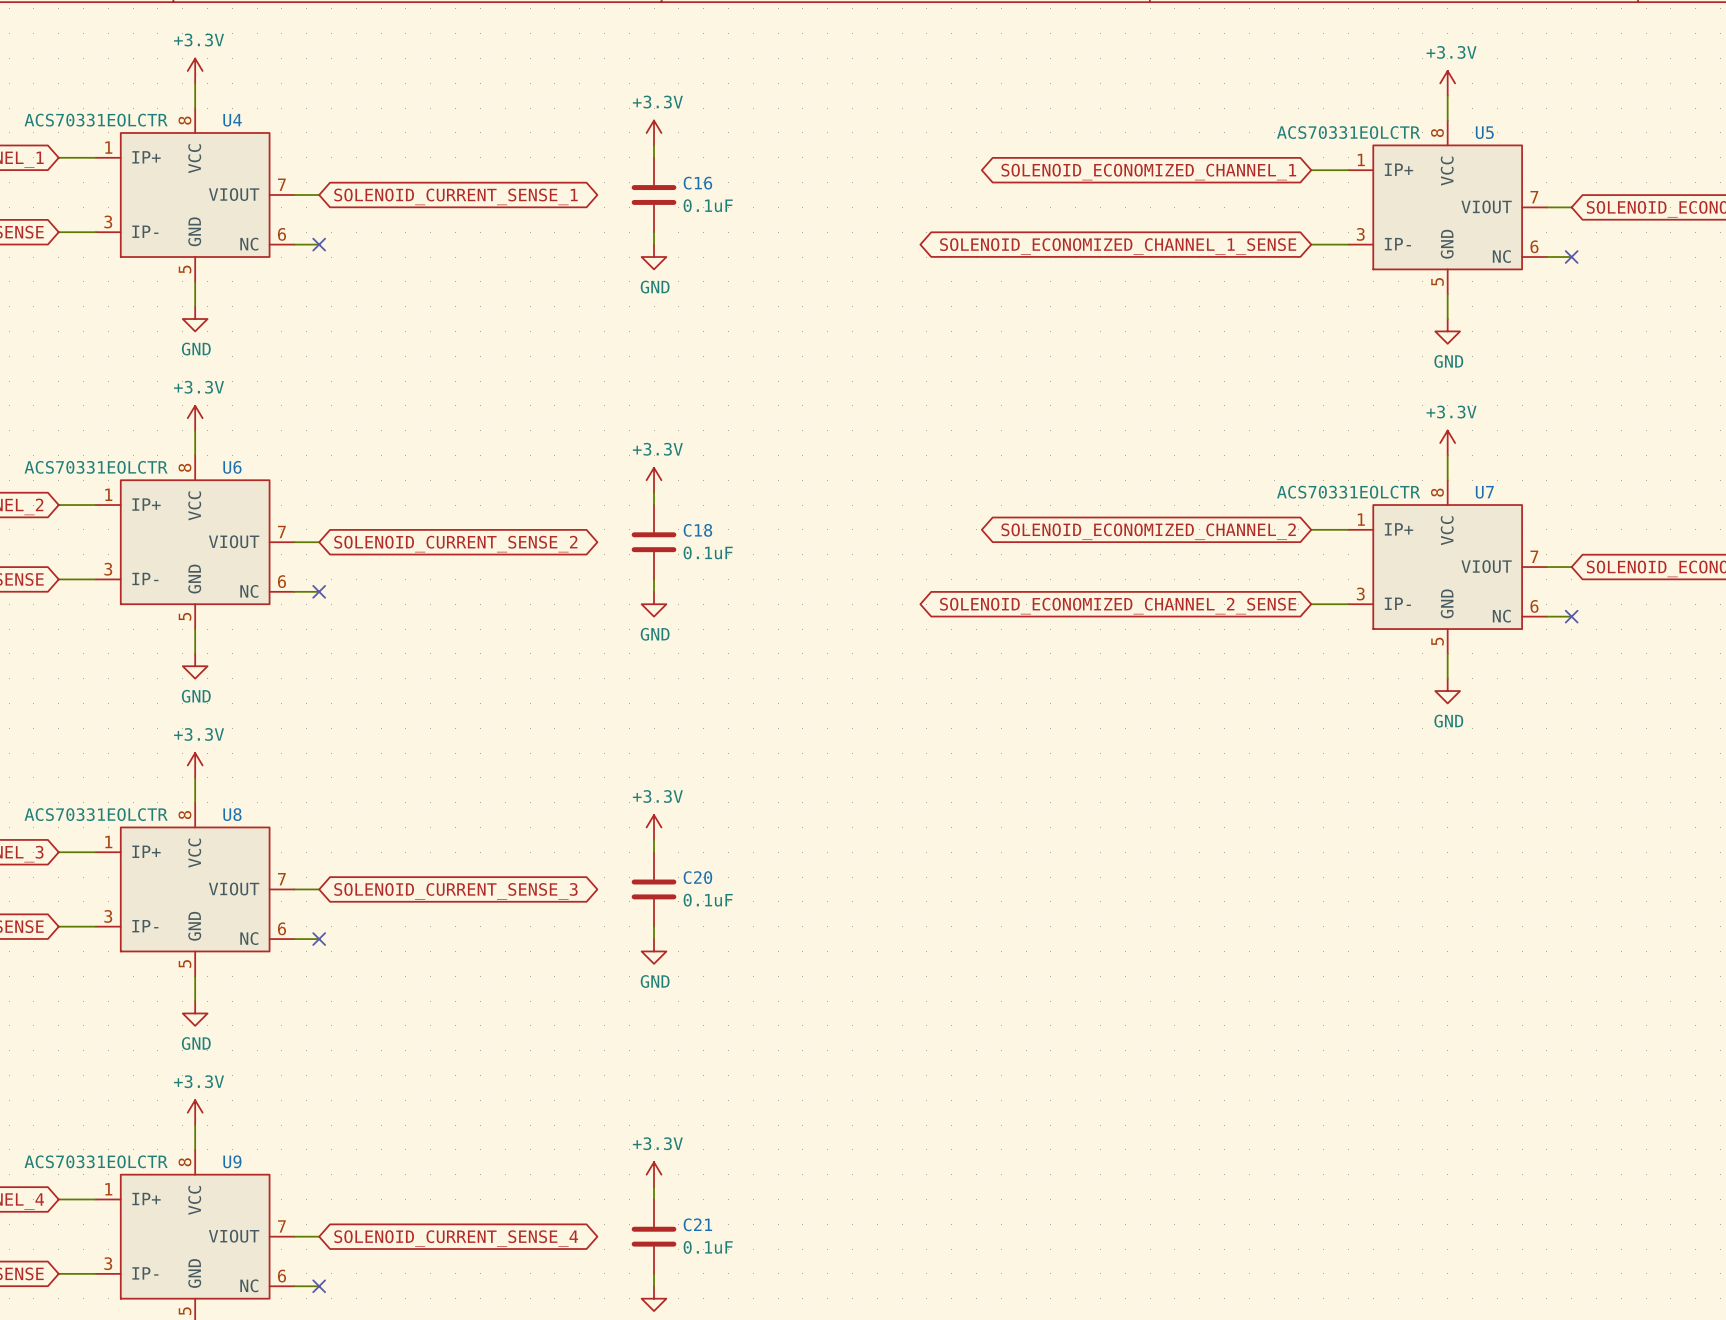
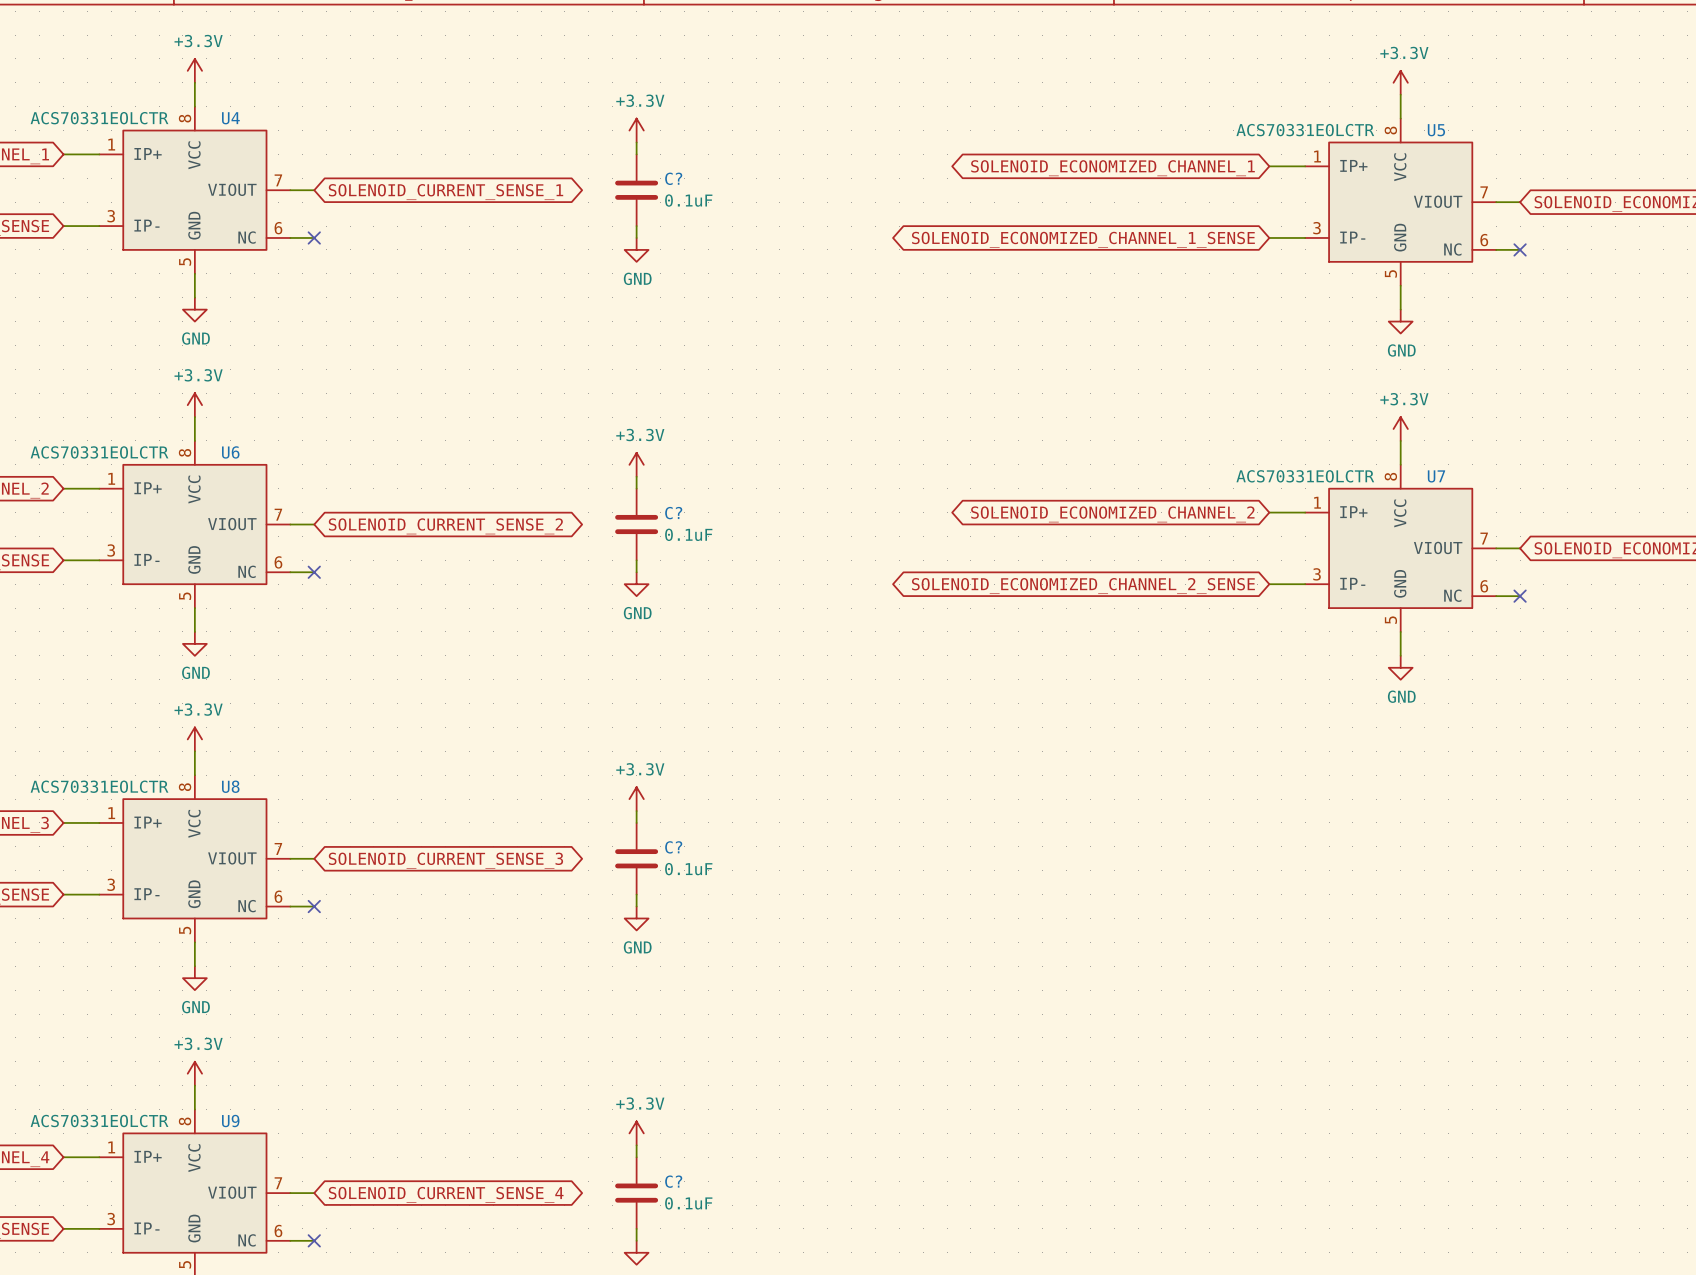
C16 name: C16 (697, 183) -> C? (673, 178)
C18 name: C18 (697, 530) -> C? (673, 513)
C20 name: C20 (697, 877) -> C? (673, 847)
C21 name: C21 (697, 1224) -> C? (673, 1181)

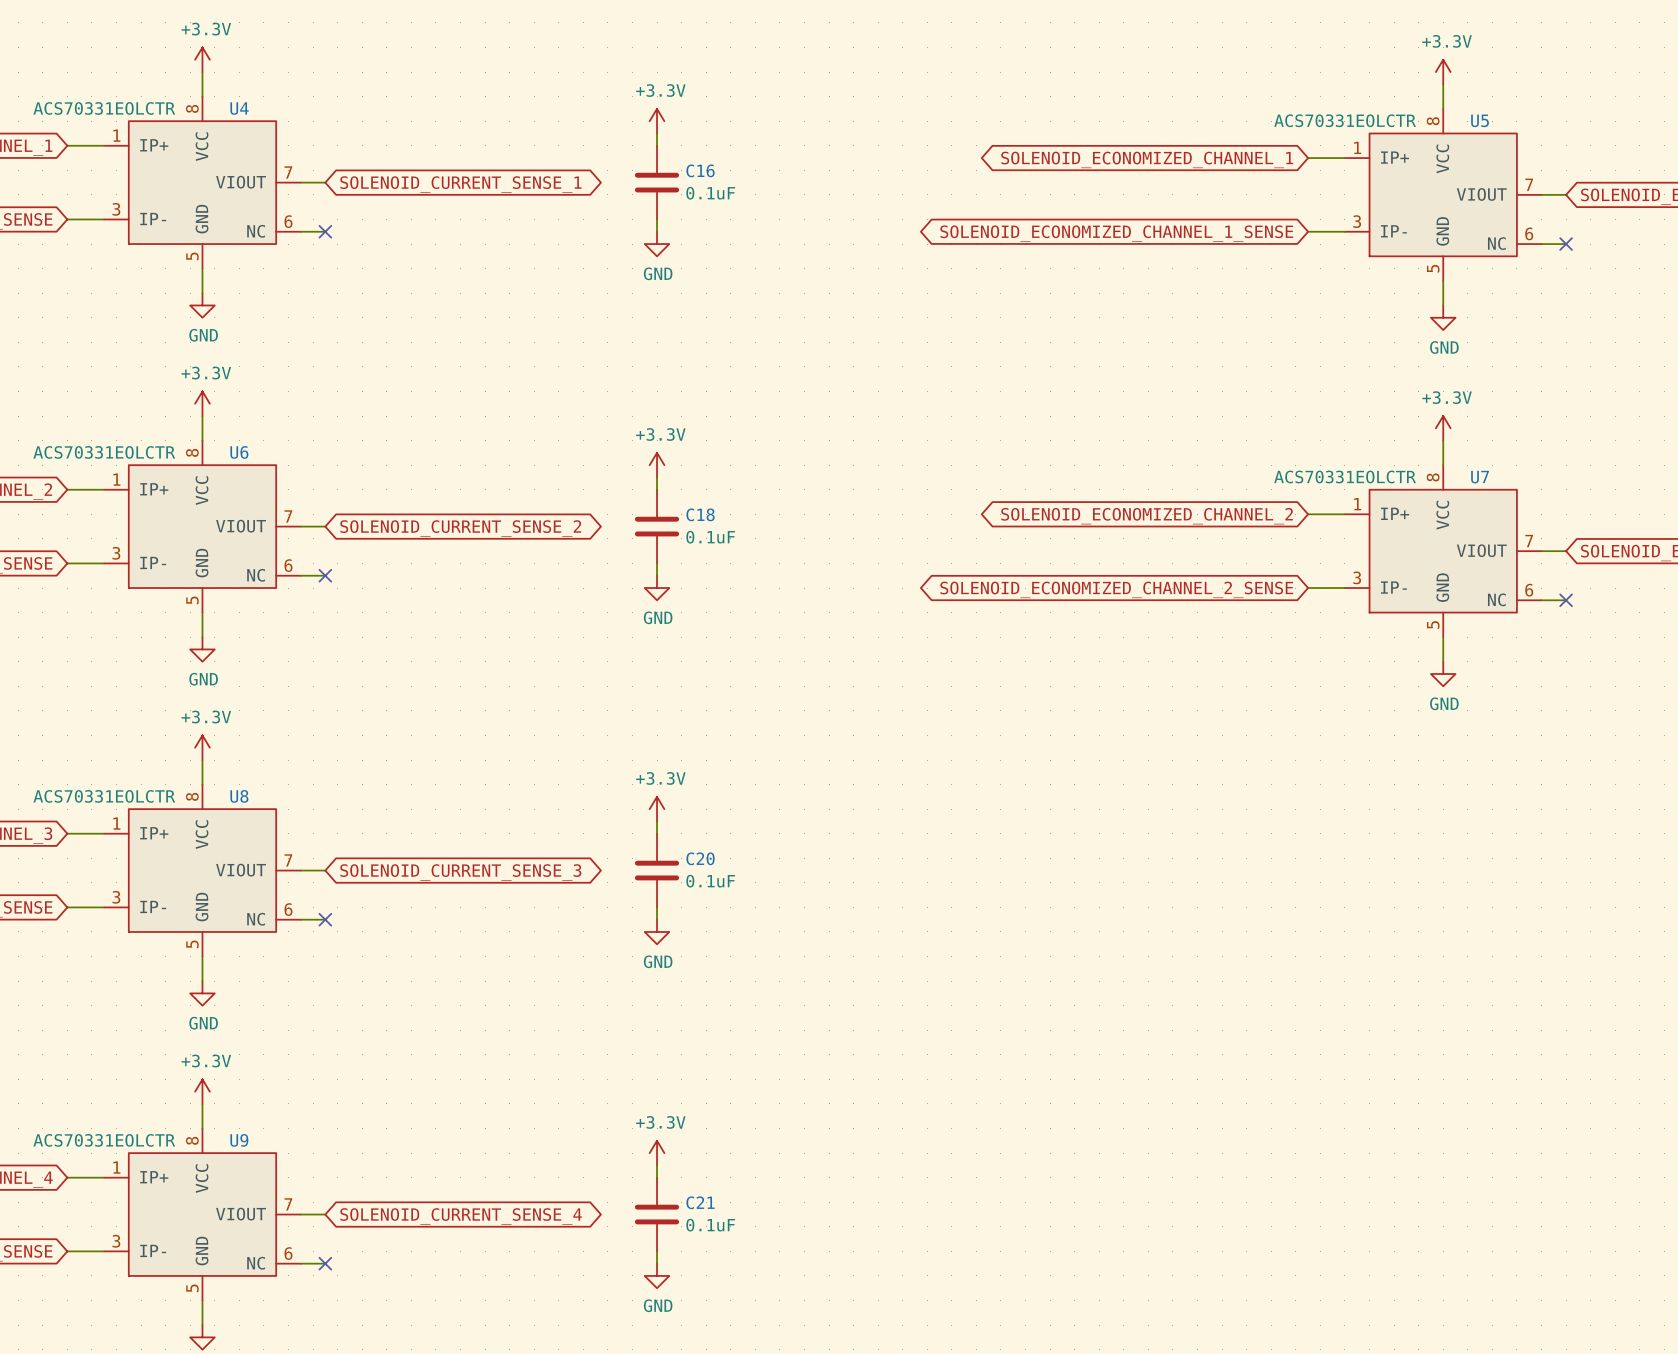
C? name: C? (673, 178) -> C16 (700, 170)
C? name: C? (673, 513) -> C18 (700, 514)
C? name: C? (673, 847) -> C20 (700, 858)
C? name: C? (673, 1181) -> C21 (700, 1202)

